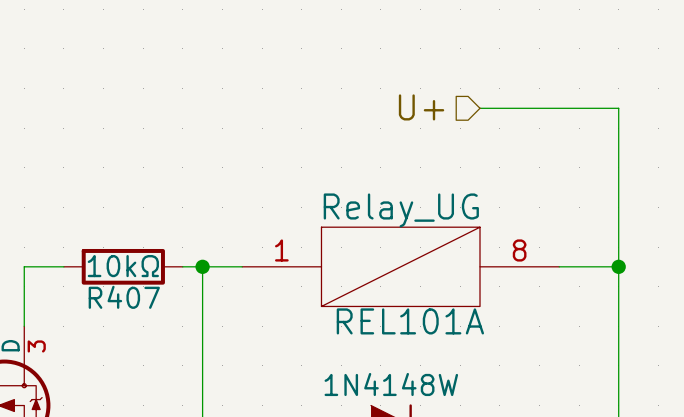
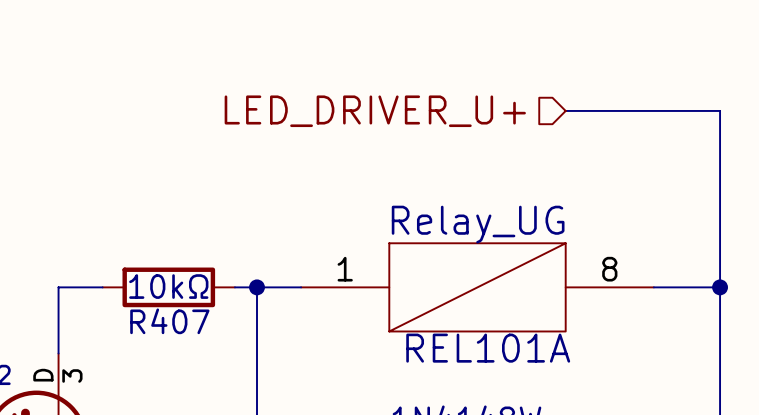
hierarchical label: U+ (421, 107) -> LED_DRIVER_U+ (375, 111)

